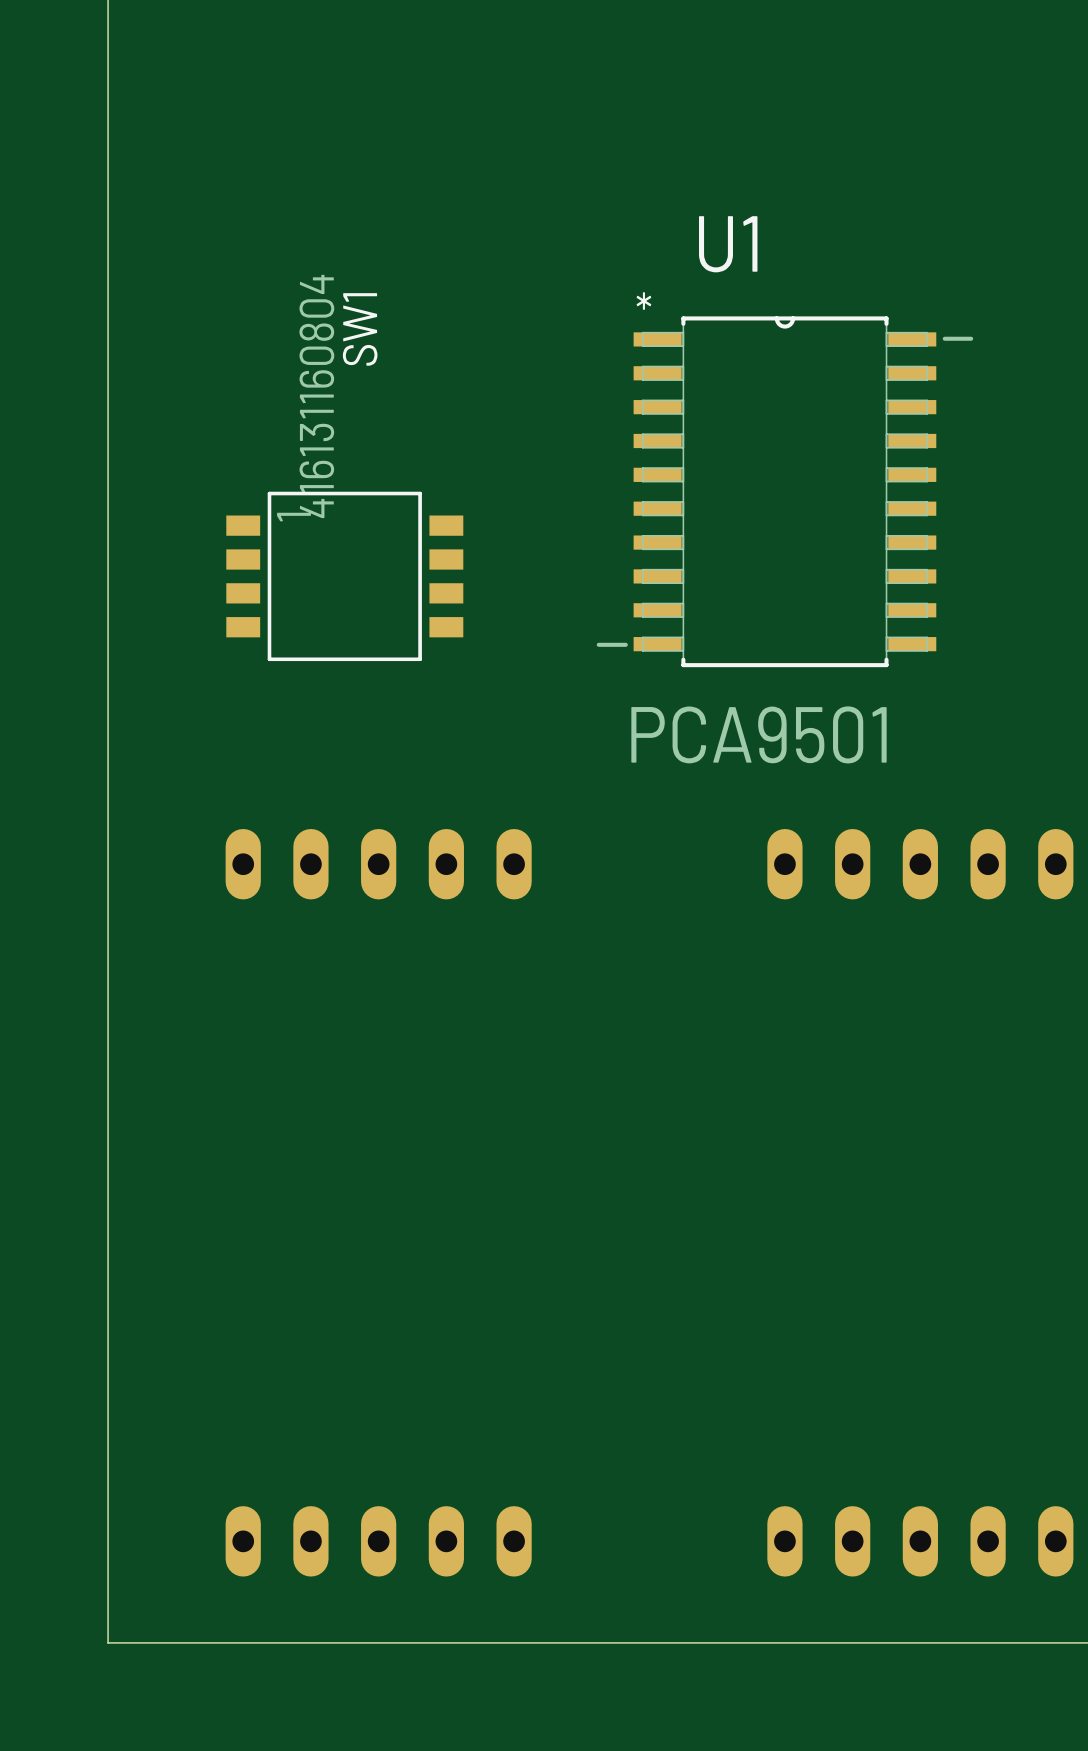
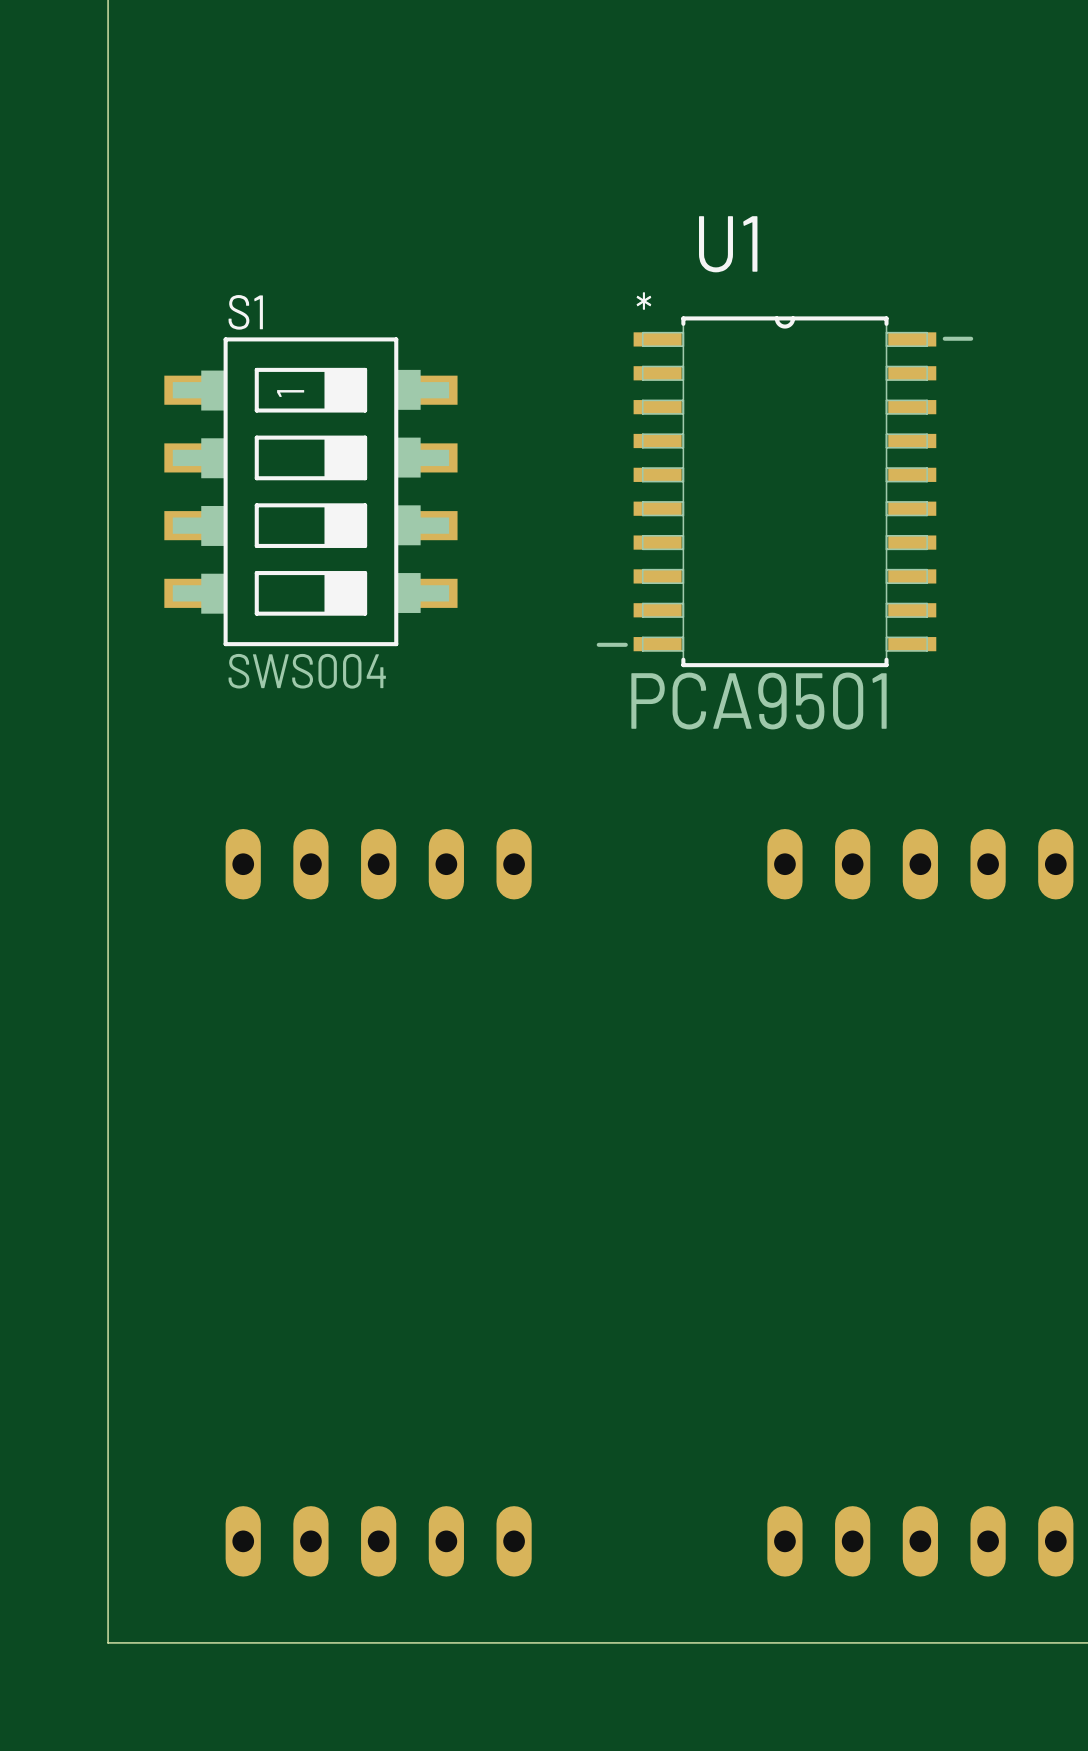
S1: none -> SWS004 (310, 491)
SW1: 416131160804 (344, 576) -> none
U1 value position: PCA9501 (759, 734) -> PCA9501 (759, 701)

